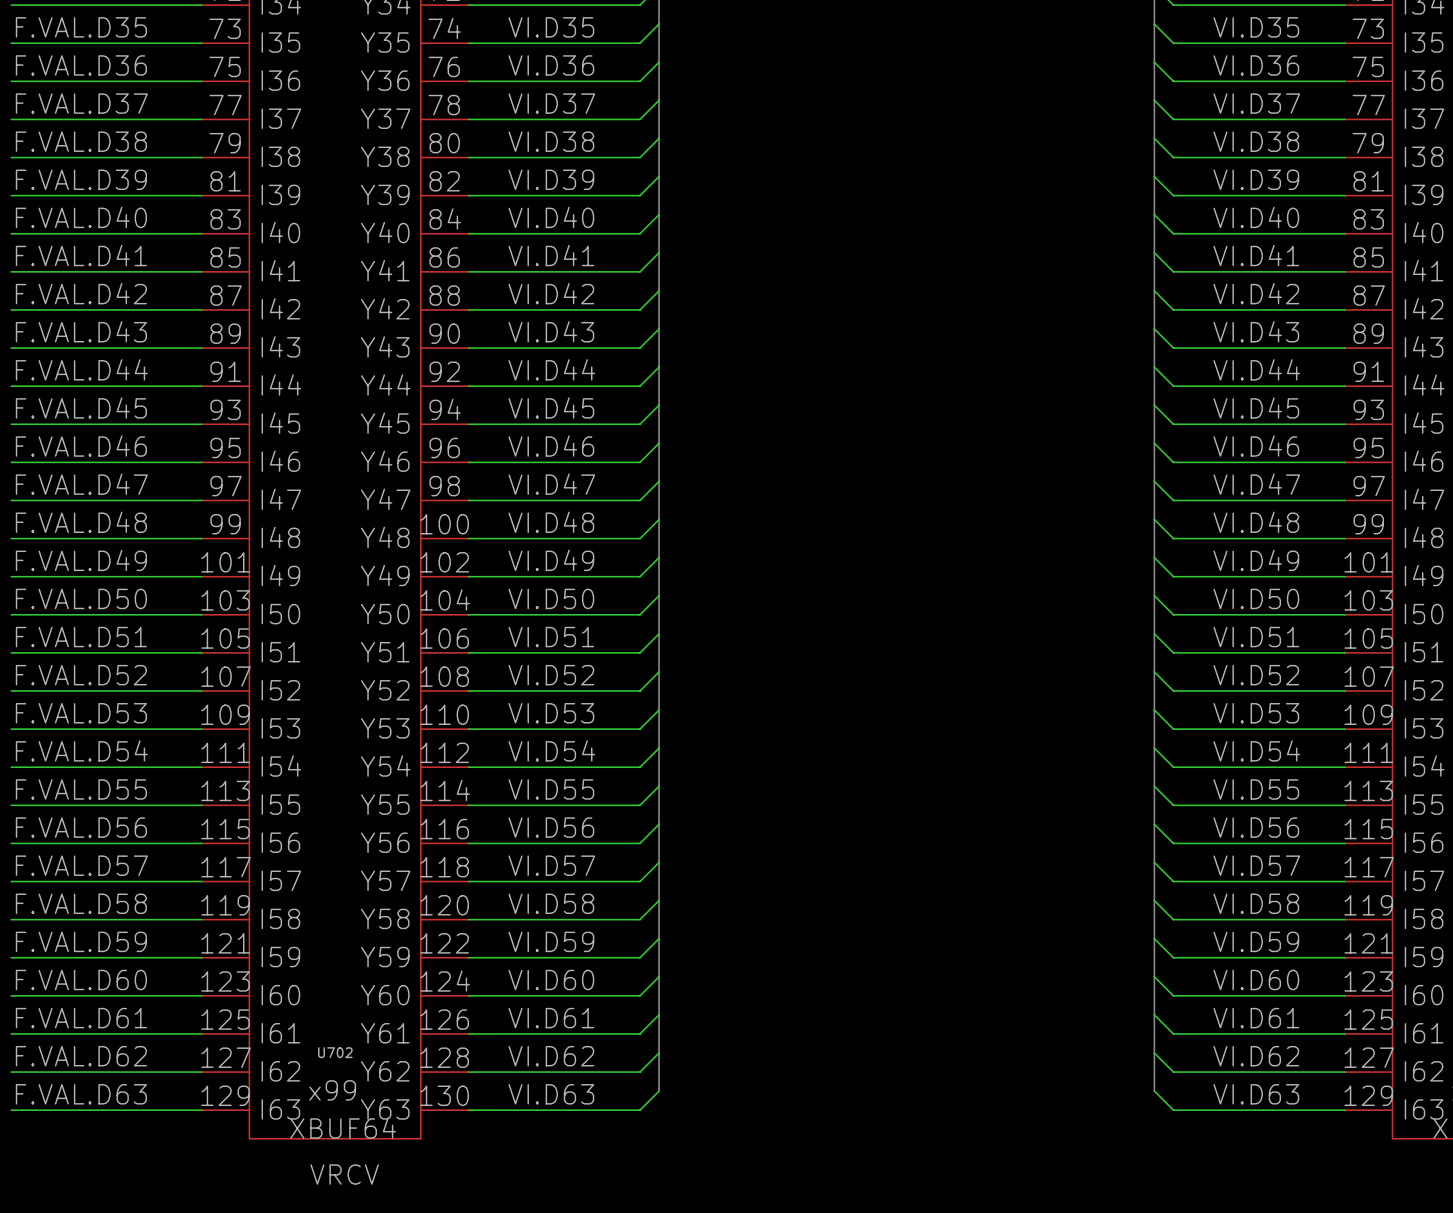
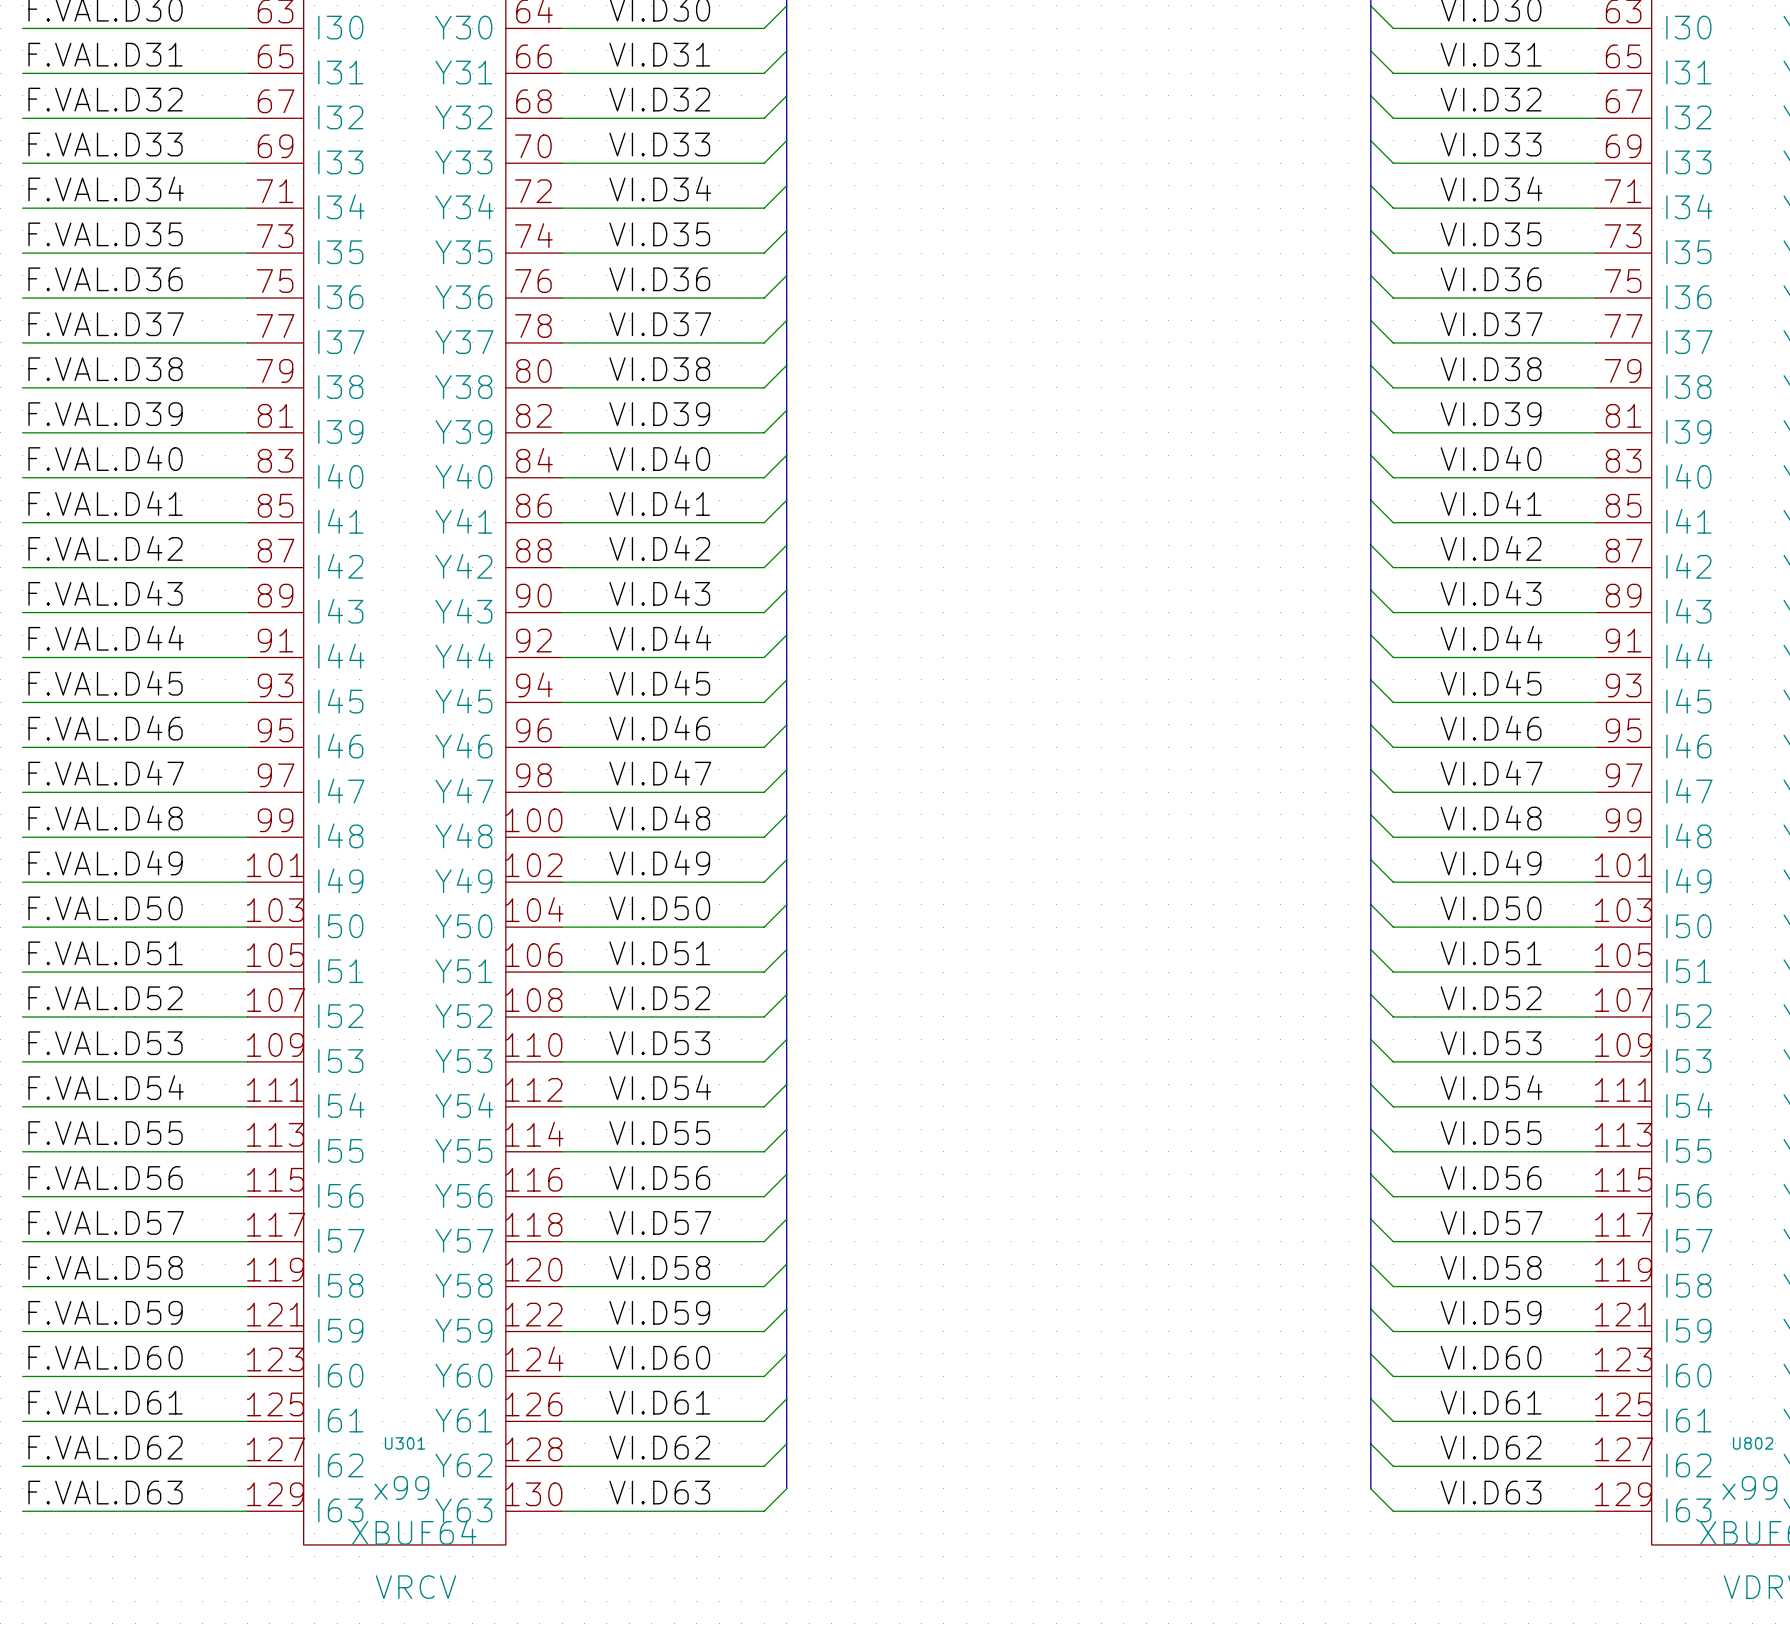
U702 name: U702 (335, 1052) -> U301 (405, 1443)

